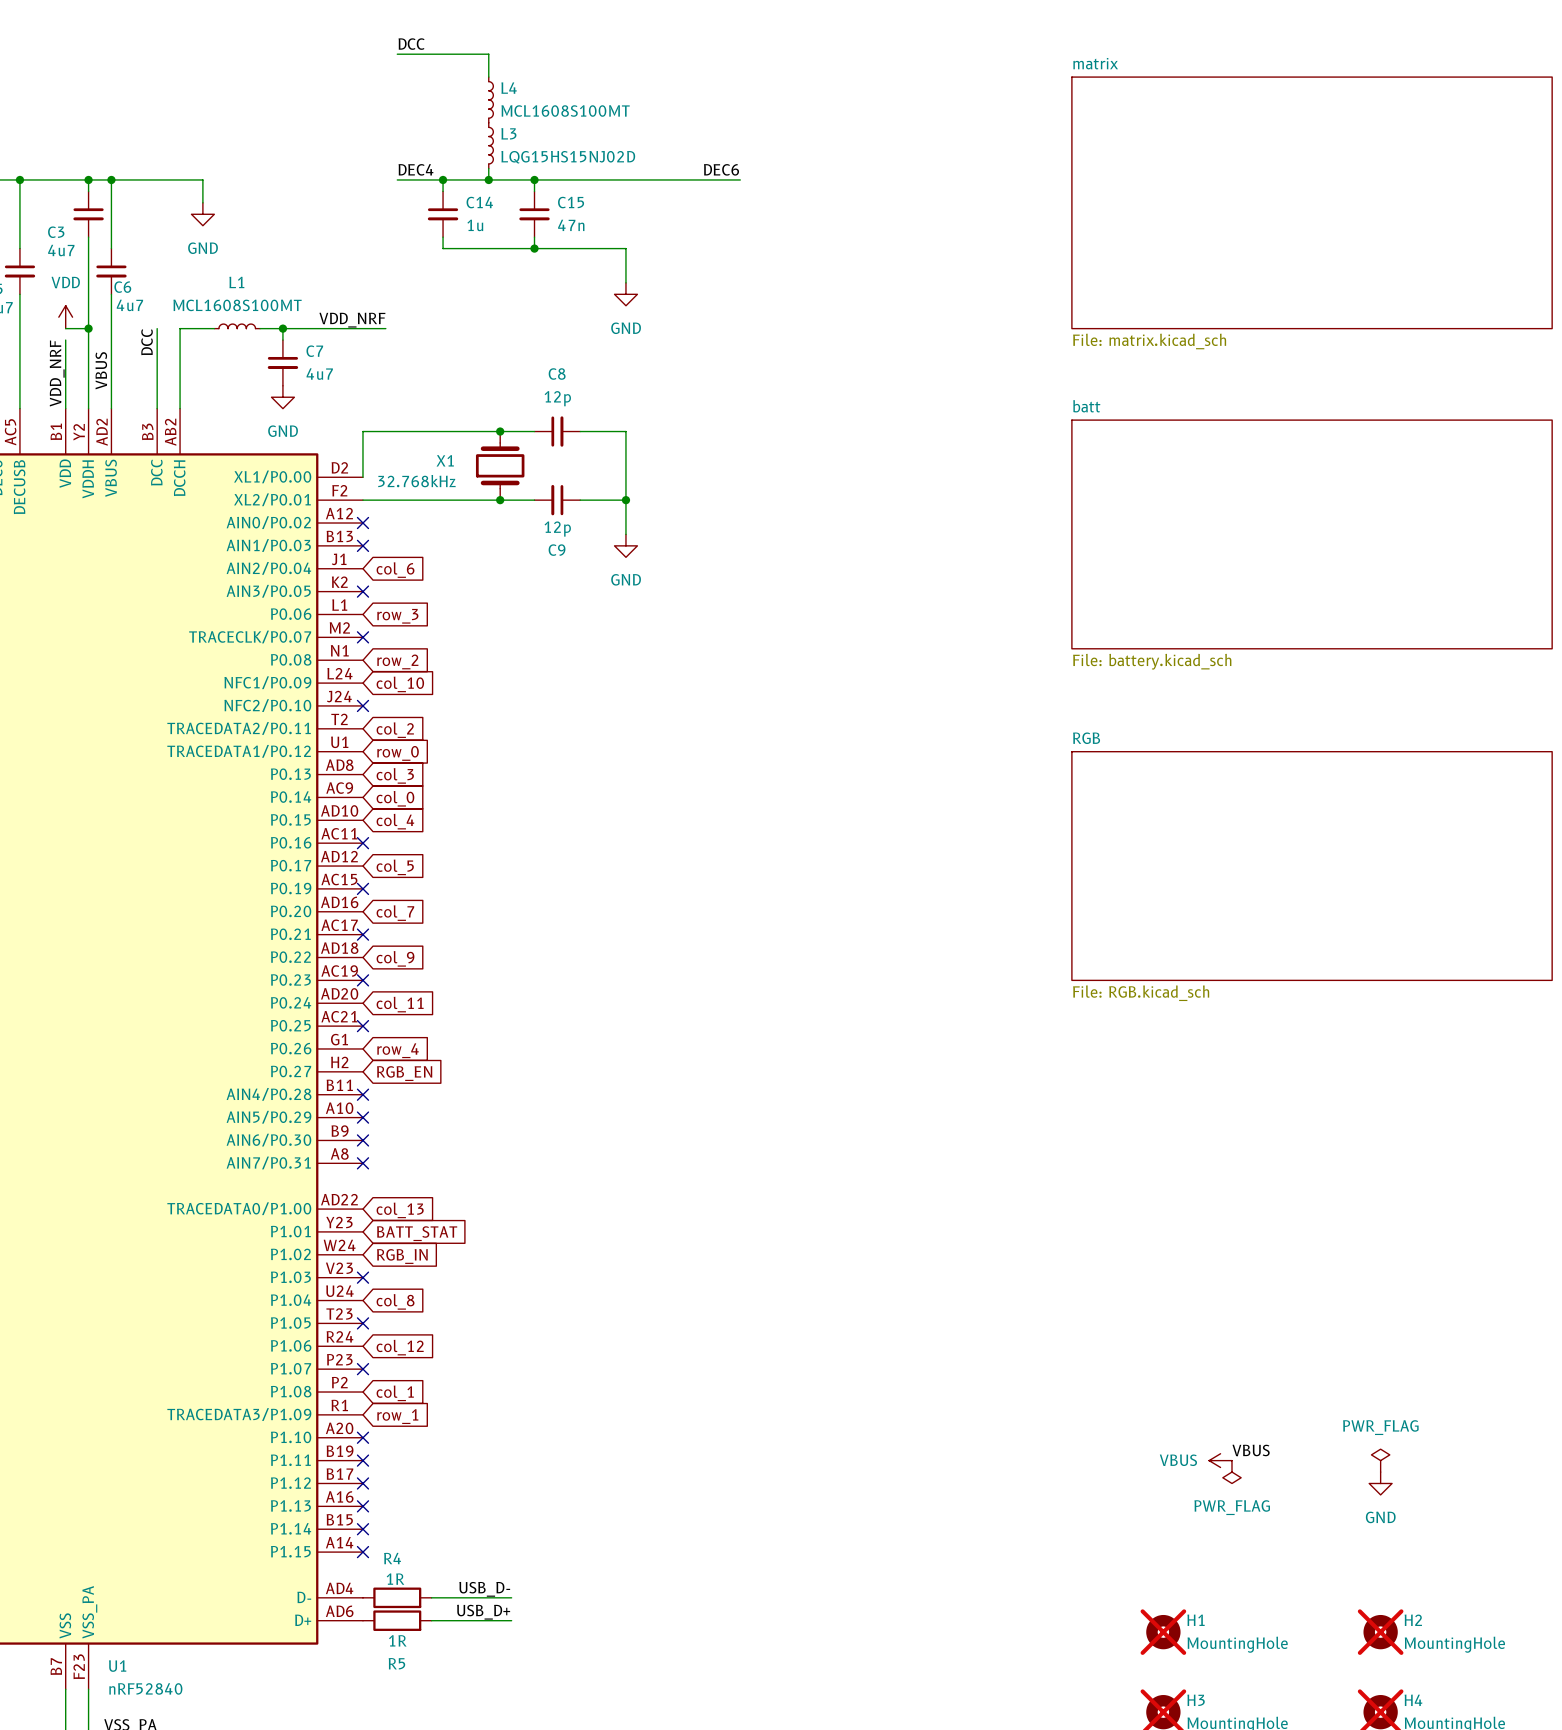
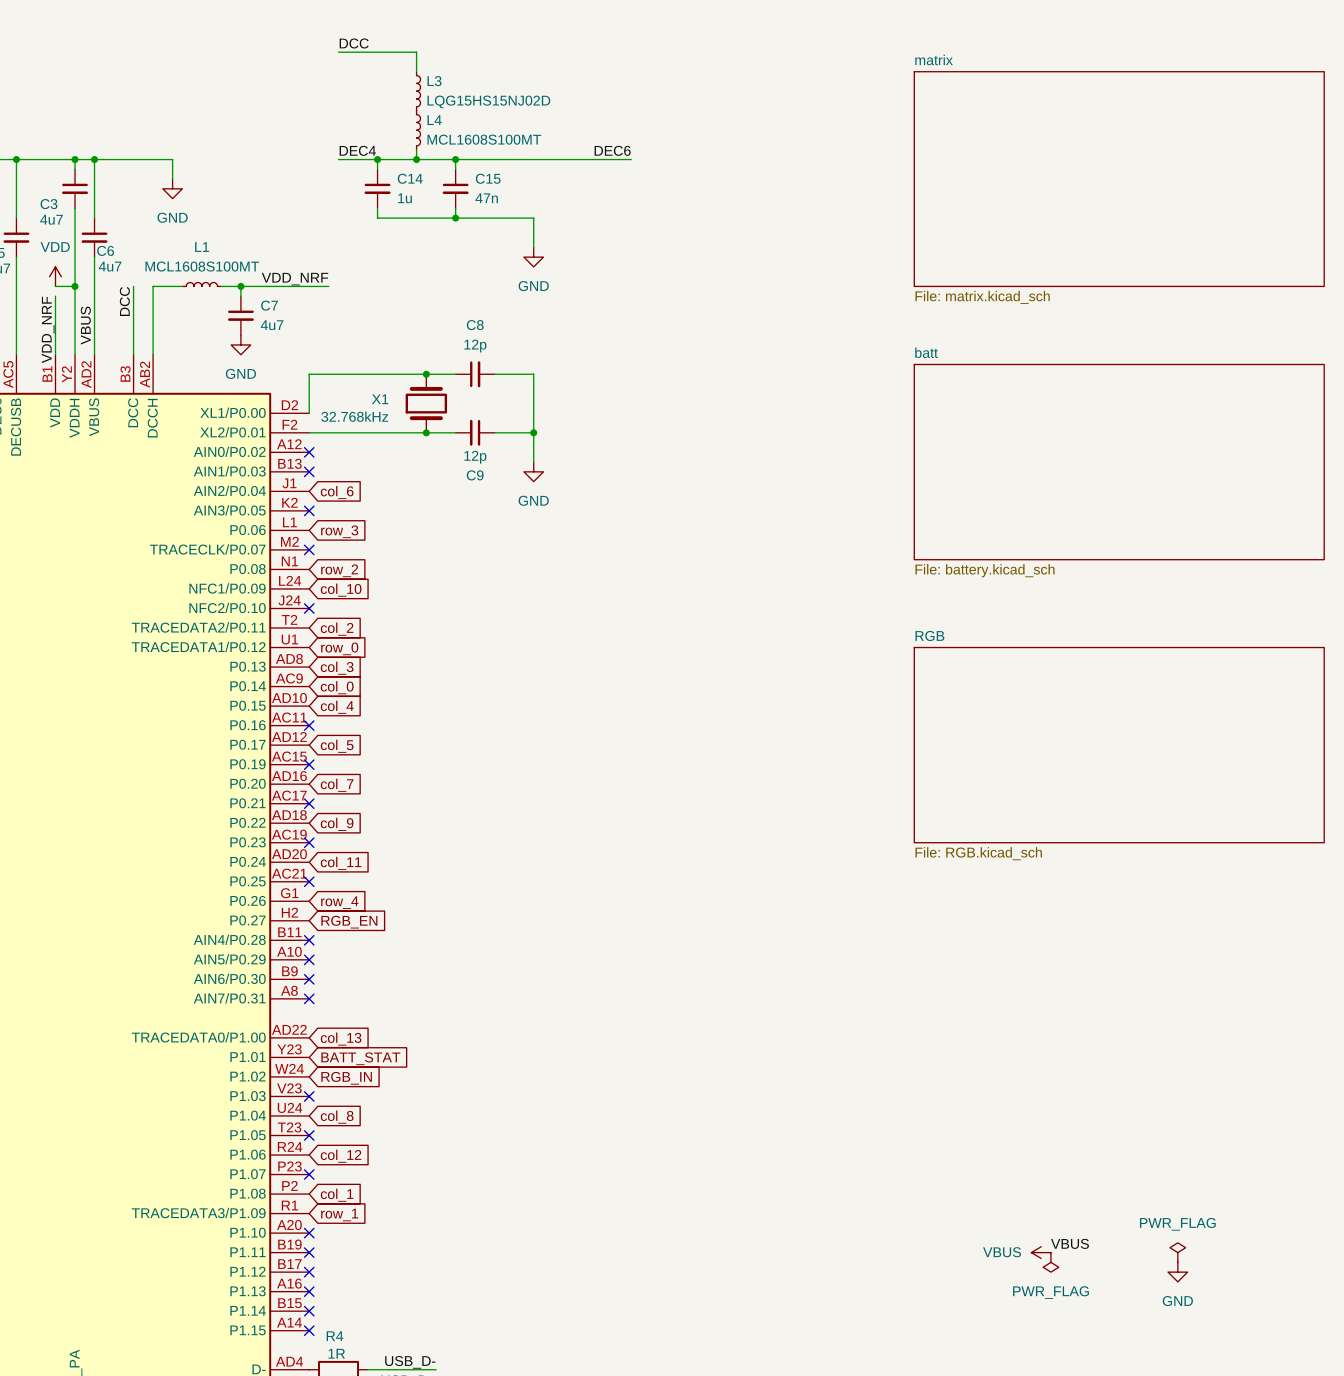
L4 name: L4 (509, 88) -> L3 (434, 81)
L4 value: MCL1608S100MT (565, 111) -> LQG15HS15NJ02D (488, 101)
L3 name: L3 (508, 133) -> L4 (434, 120)
L3 value: LQG15HS15NJ02D (568, 157) -> MCL1608S100MT (484, 139)

